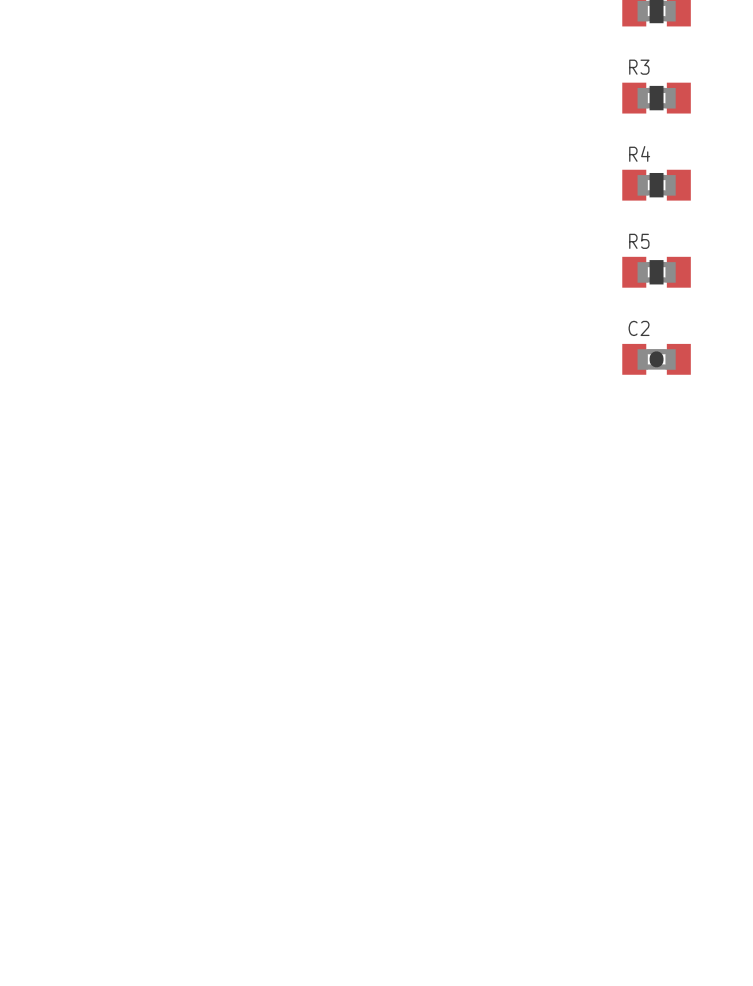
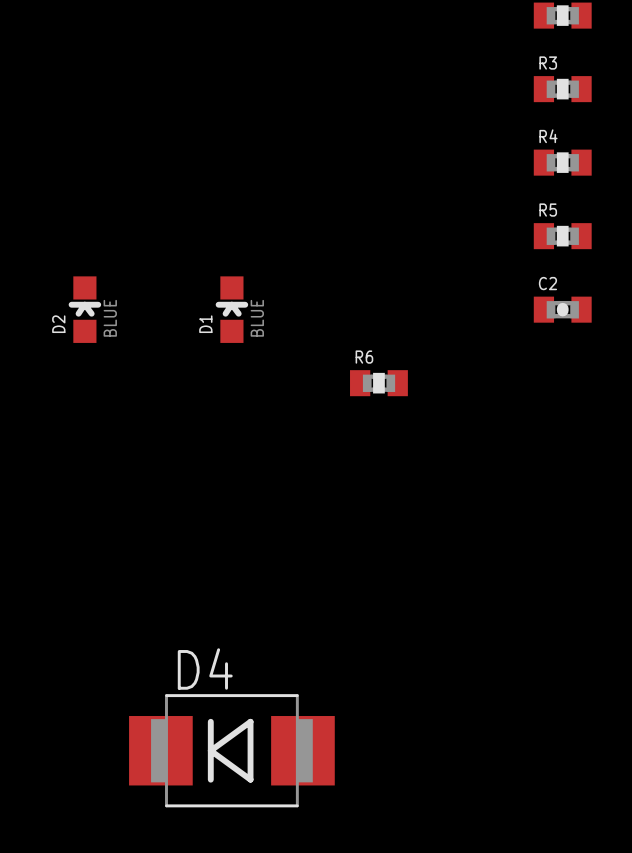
D2: none -> BLUE (84, 309)
D1: none -> BLUE (231, 309)
R6: none -> (378, 383)
D4: none -> (231, 750)

